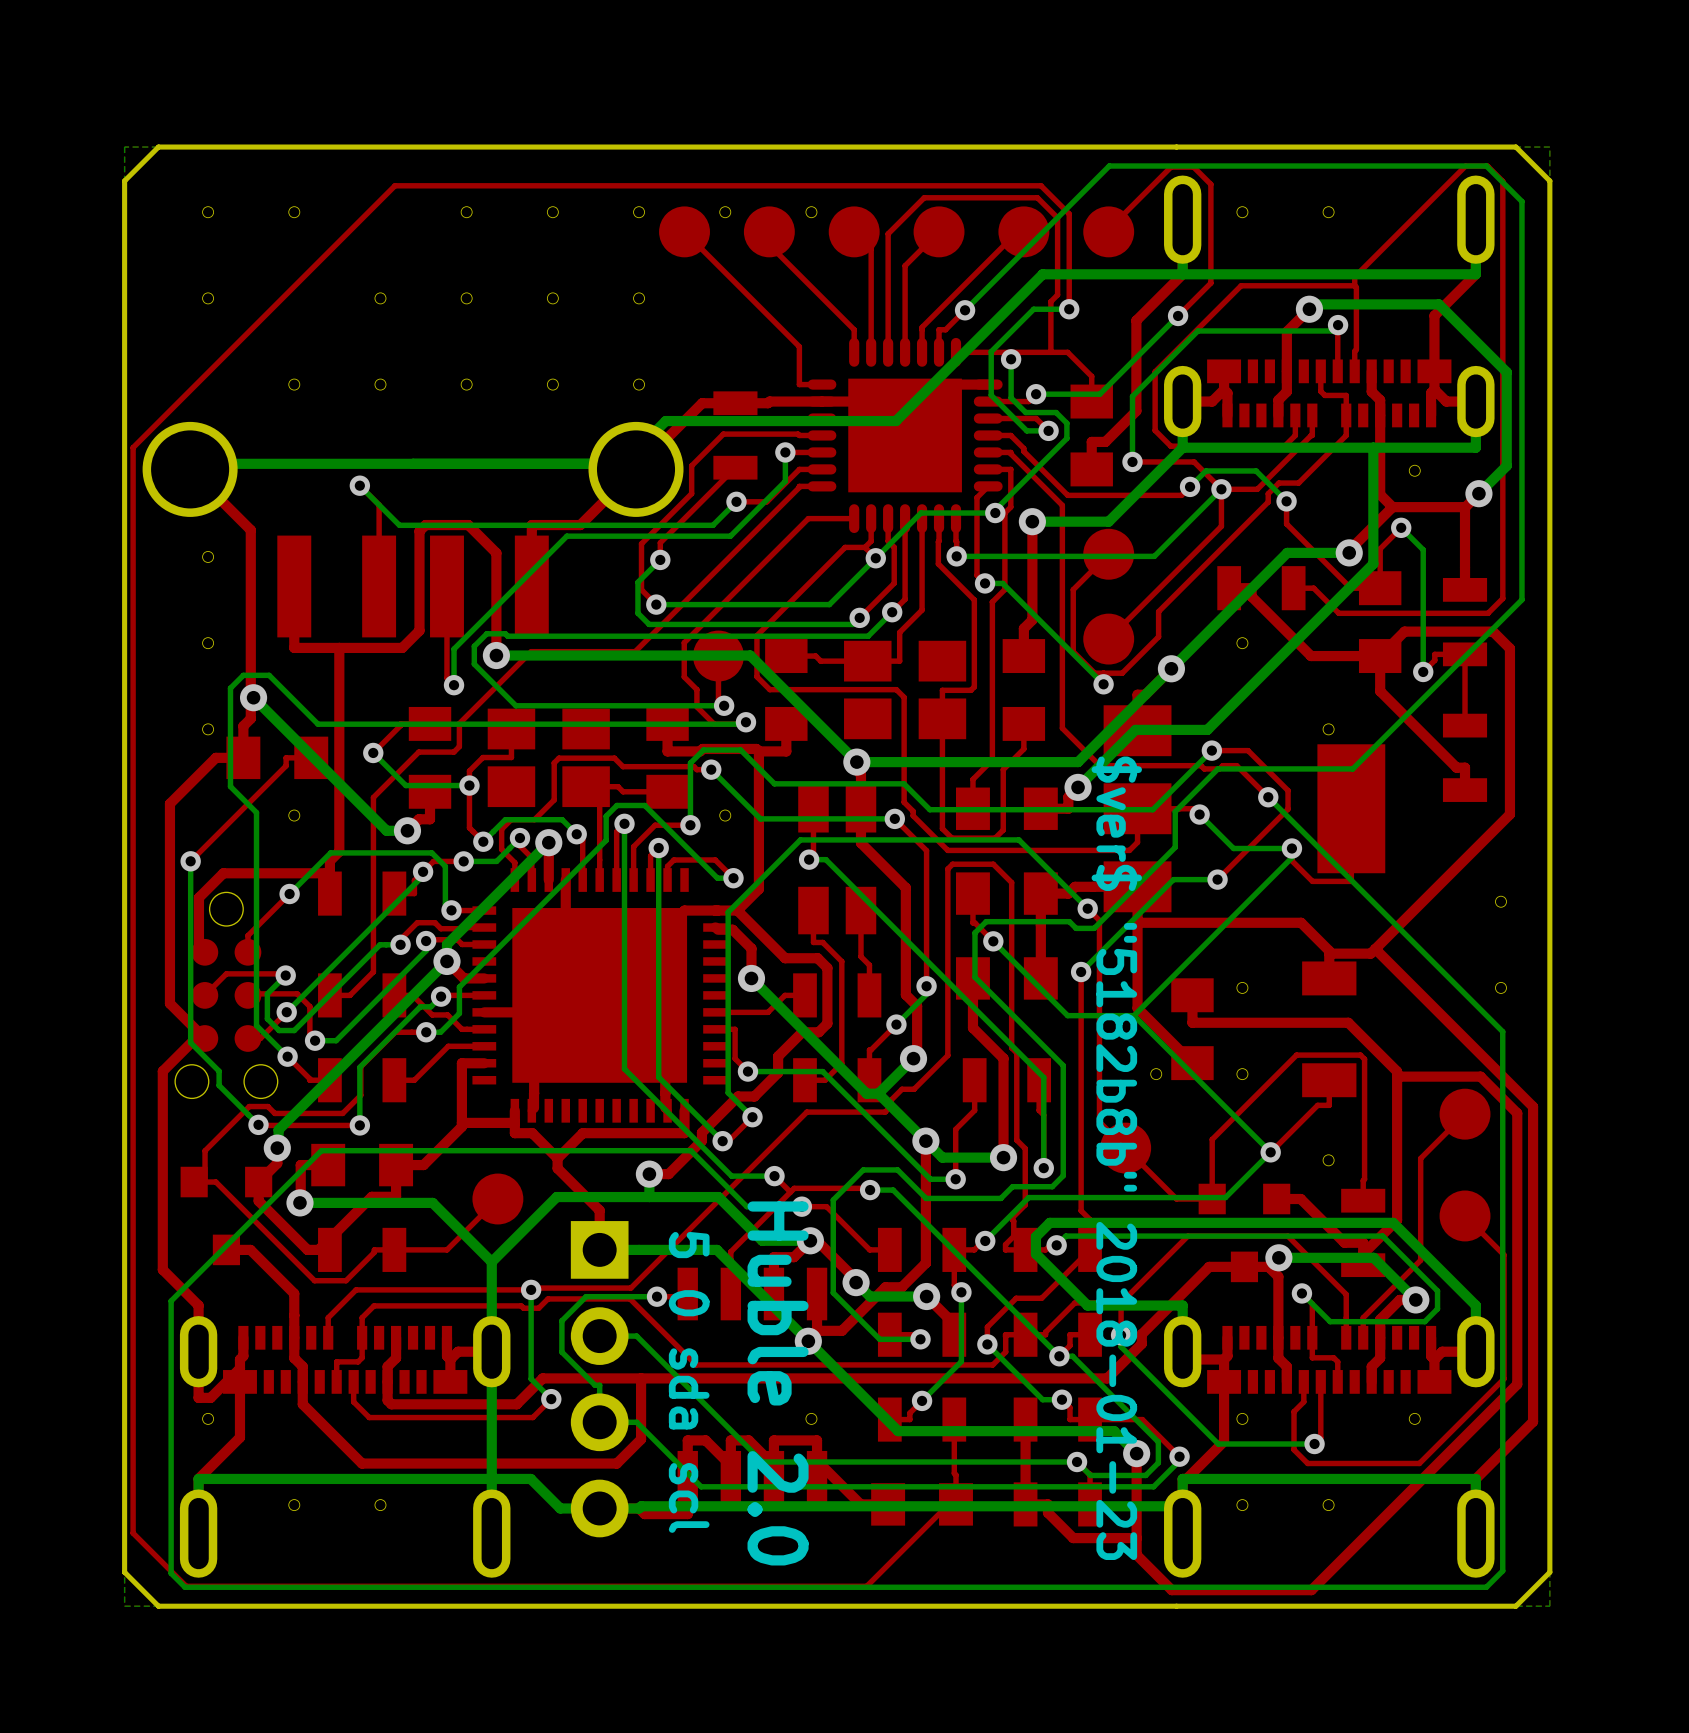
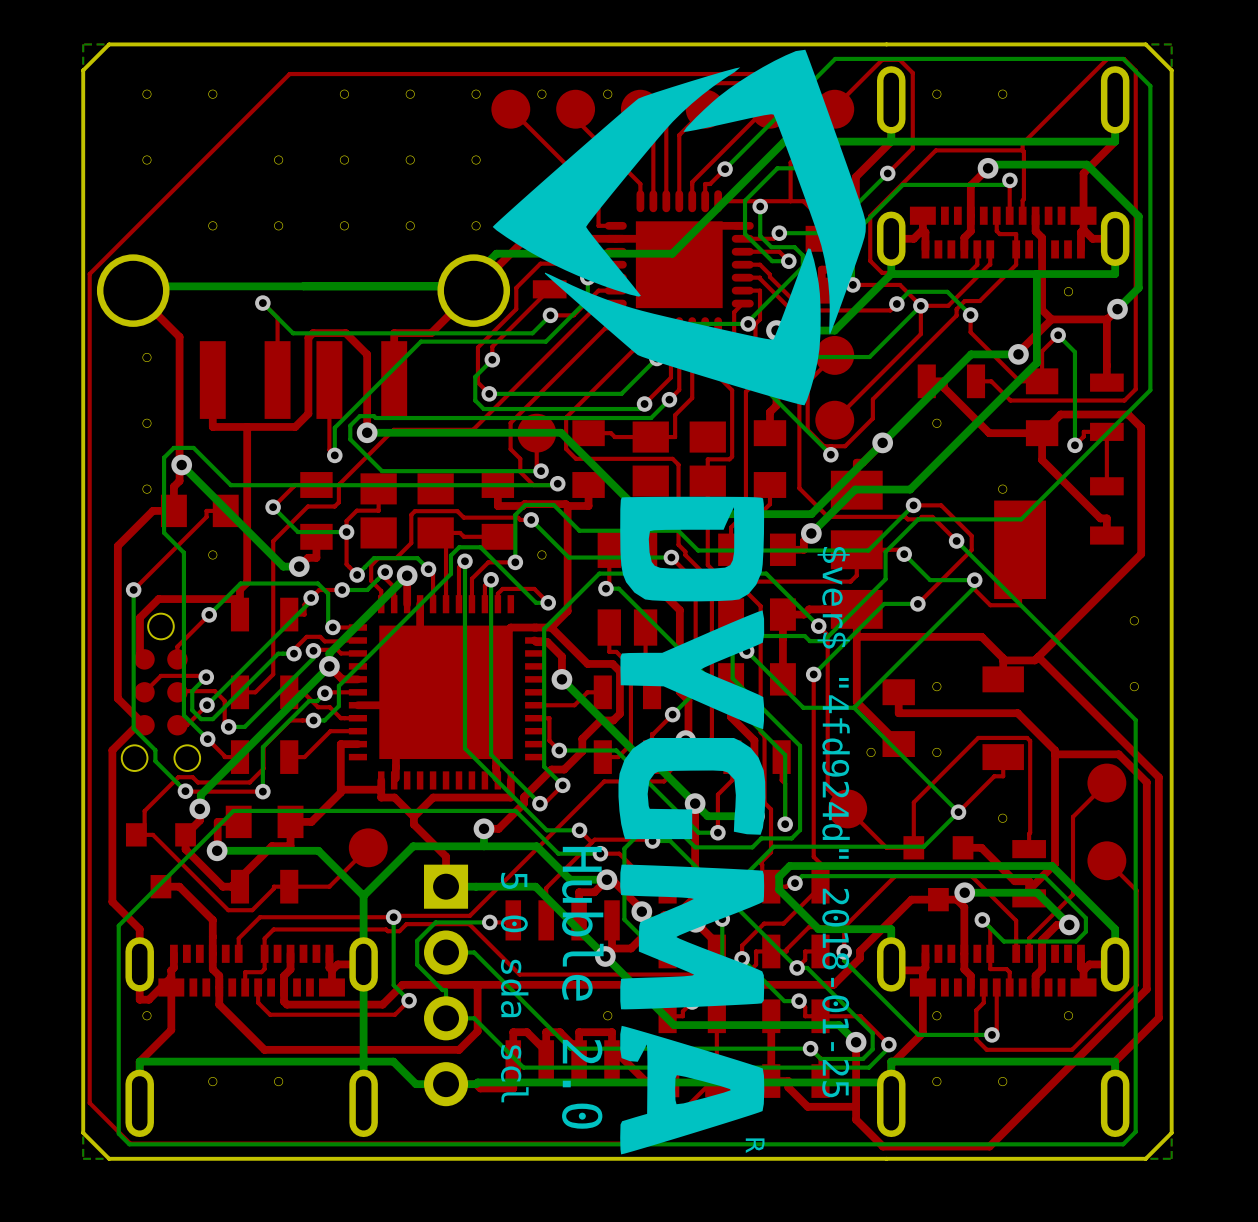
drawing: none -> [492, 49, 866, 1155]
text: $ver$ "5182b8b" 2018-01-23 (1116, 1158) -> $ver$ "4fd924d" 2018-01-25 (833, 822)

